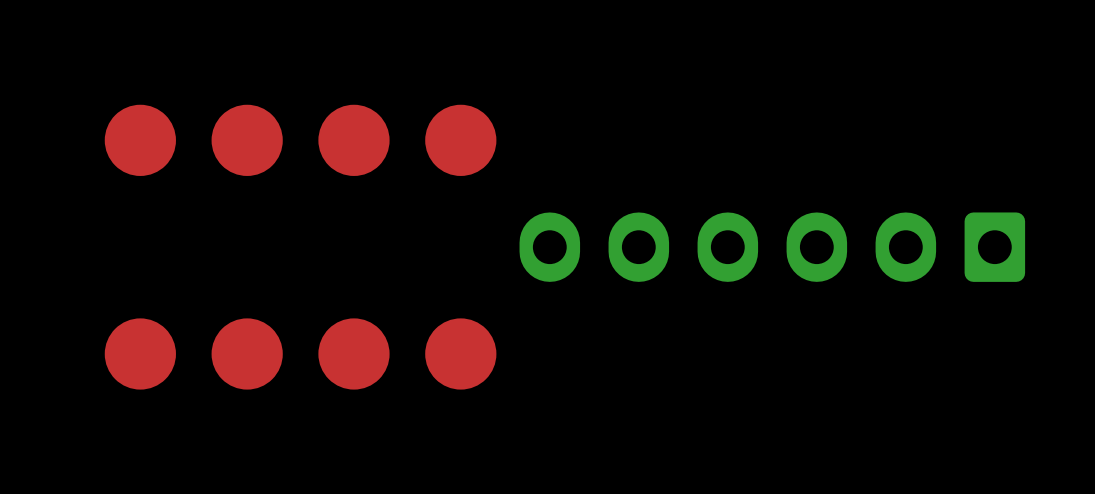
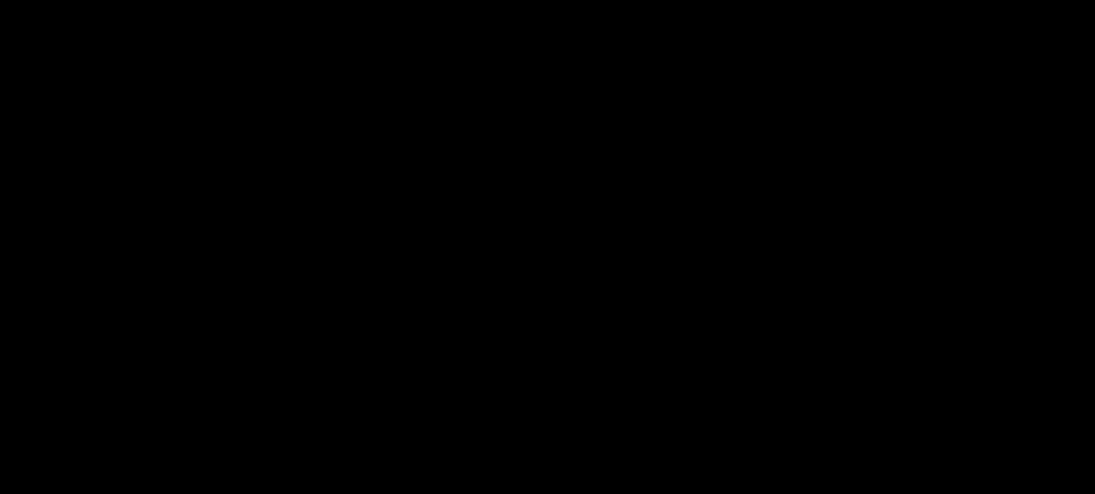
part: (140, 140) -> none
part: (247, 140) -> none
part: (353, 140) -> none
part: (460, 140) -> none
part: (772, 247) -> none
part: (140, 353) -> none
part: (247, 353) -> none
part: (353, 353) -> none
part: (460, 353) -> none

